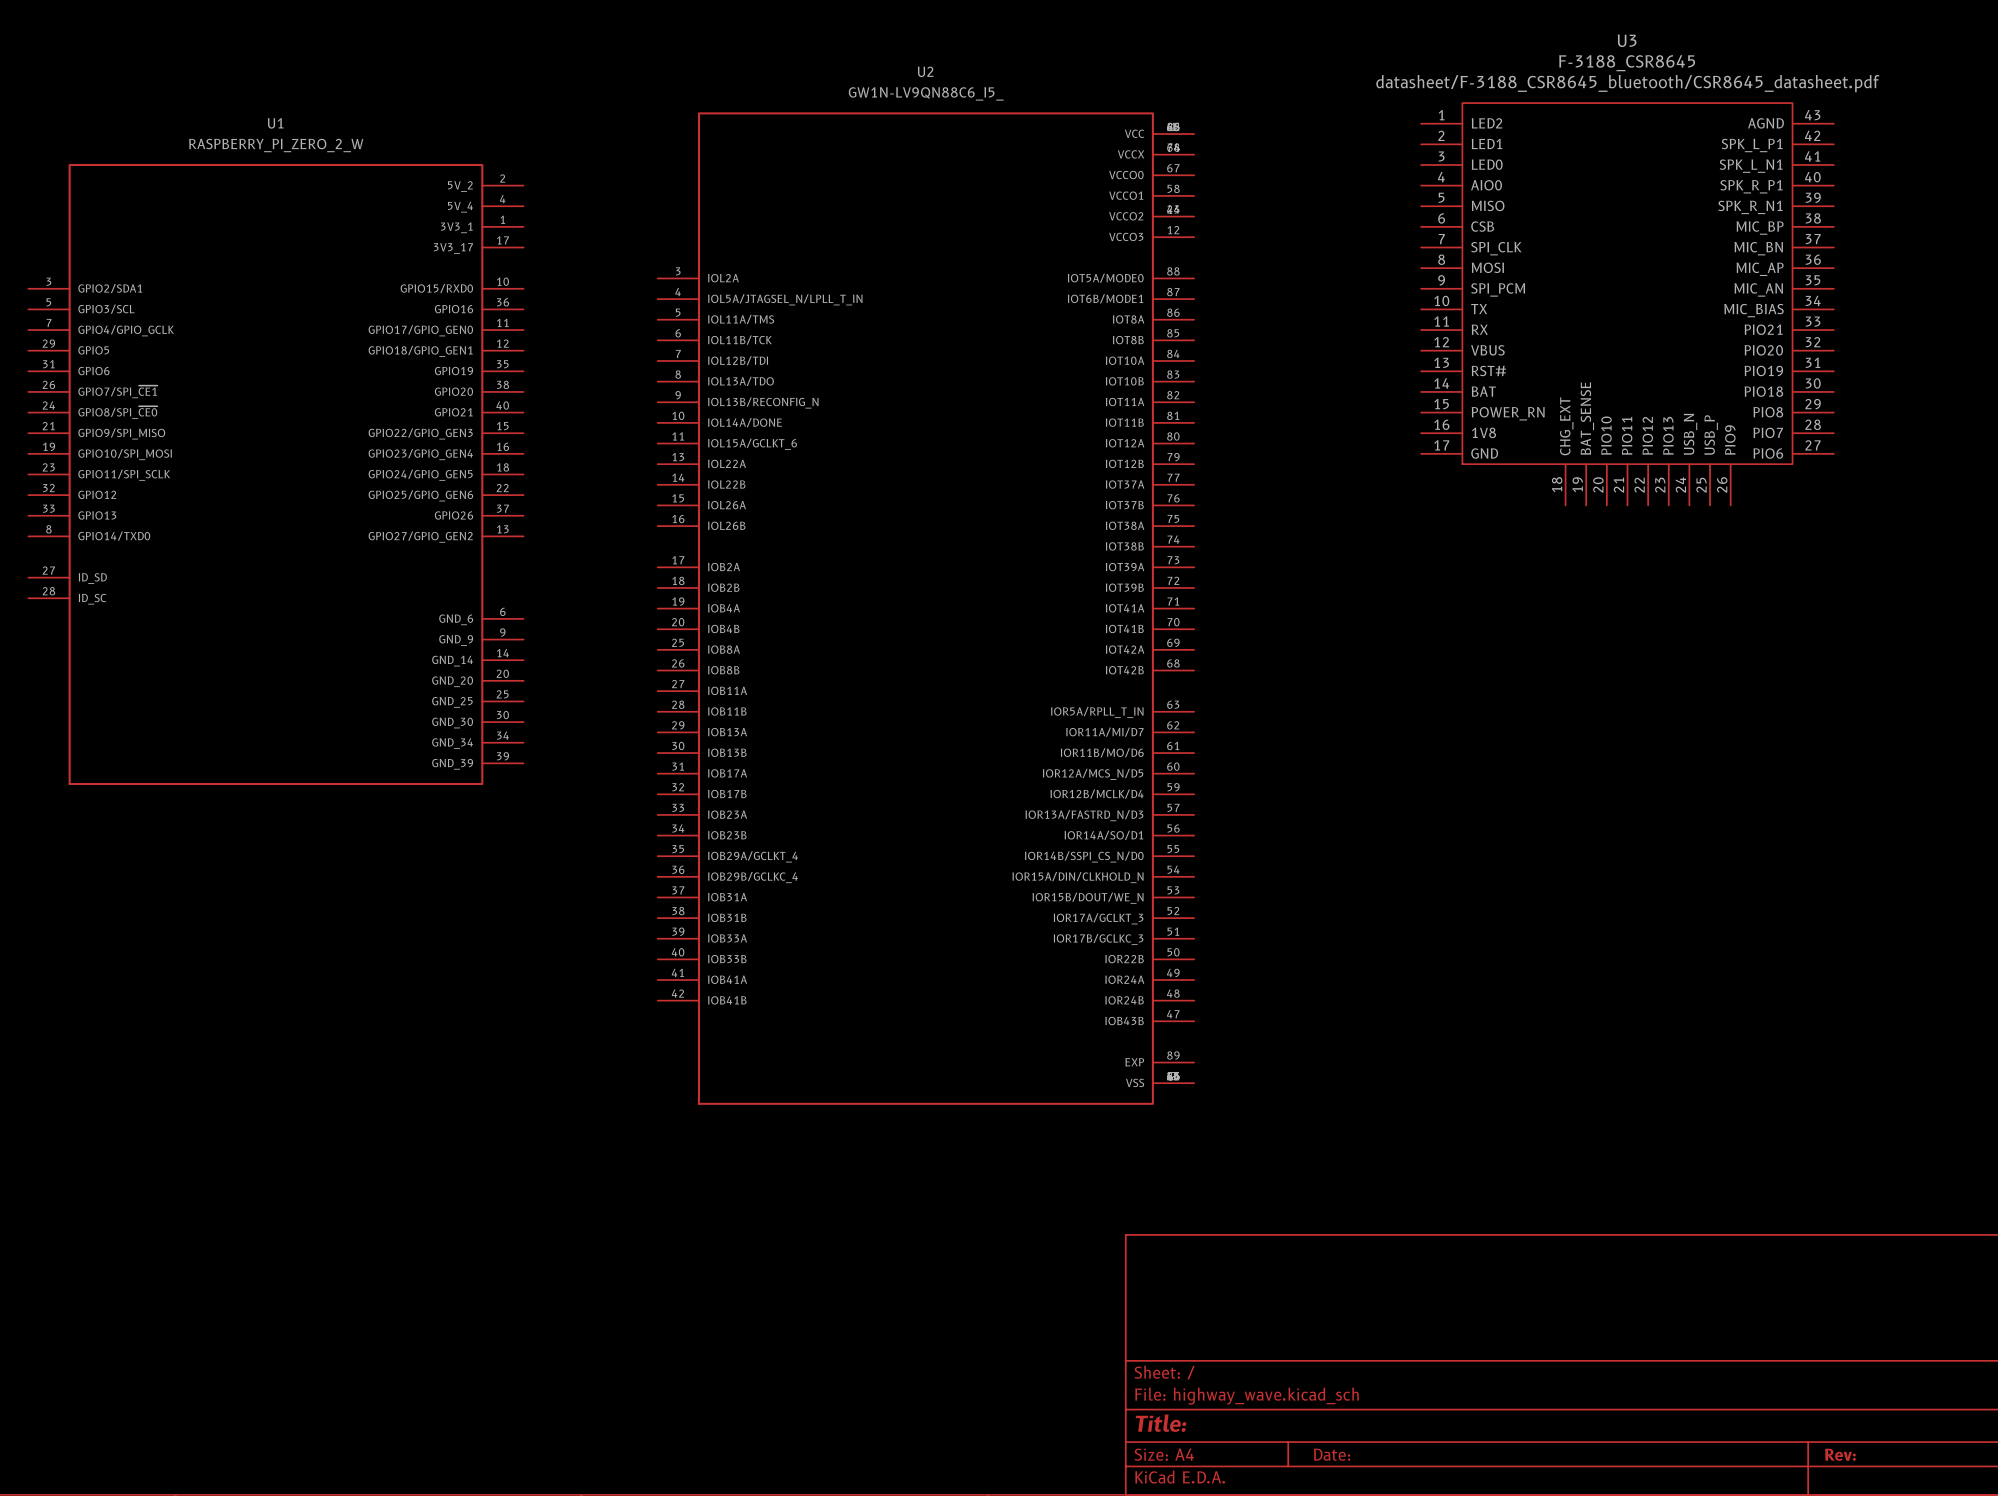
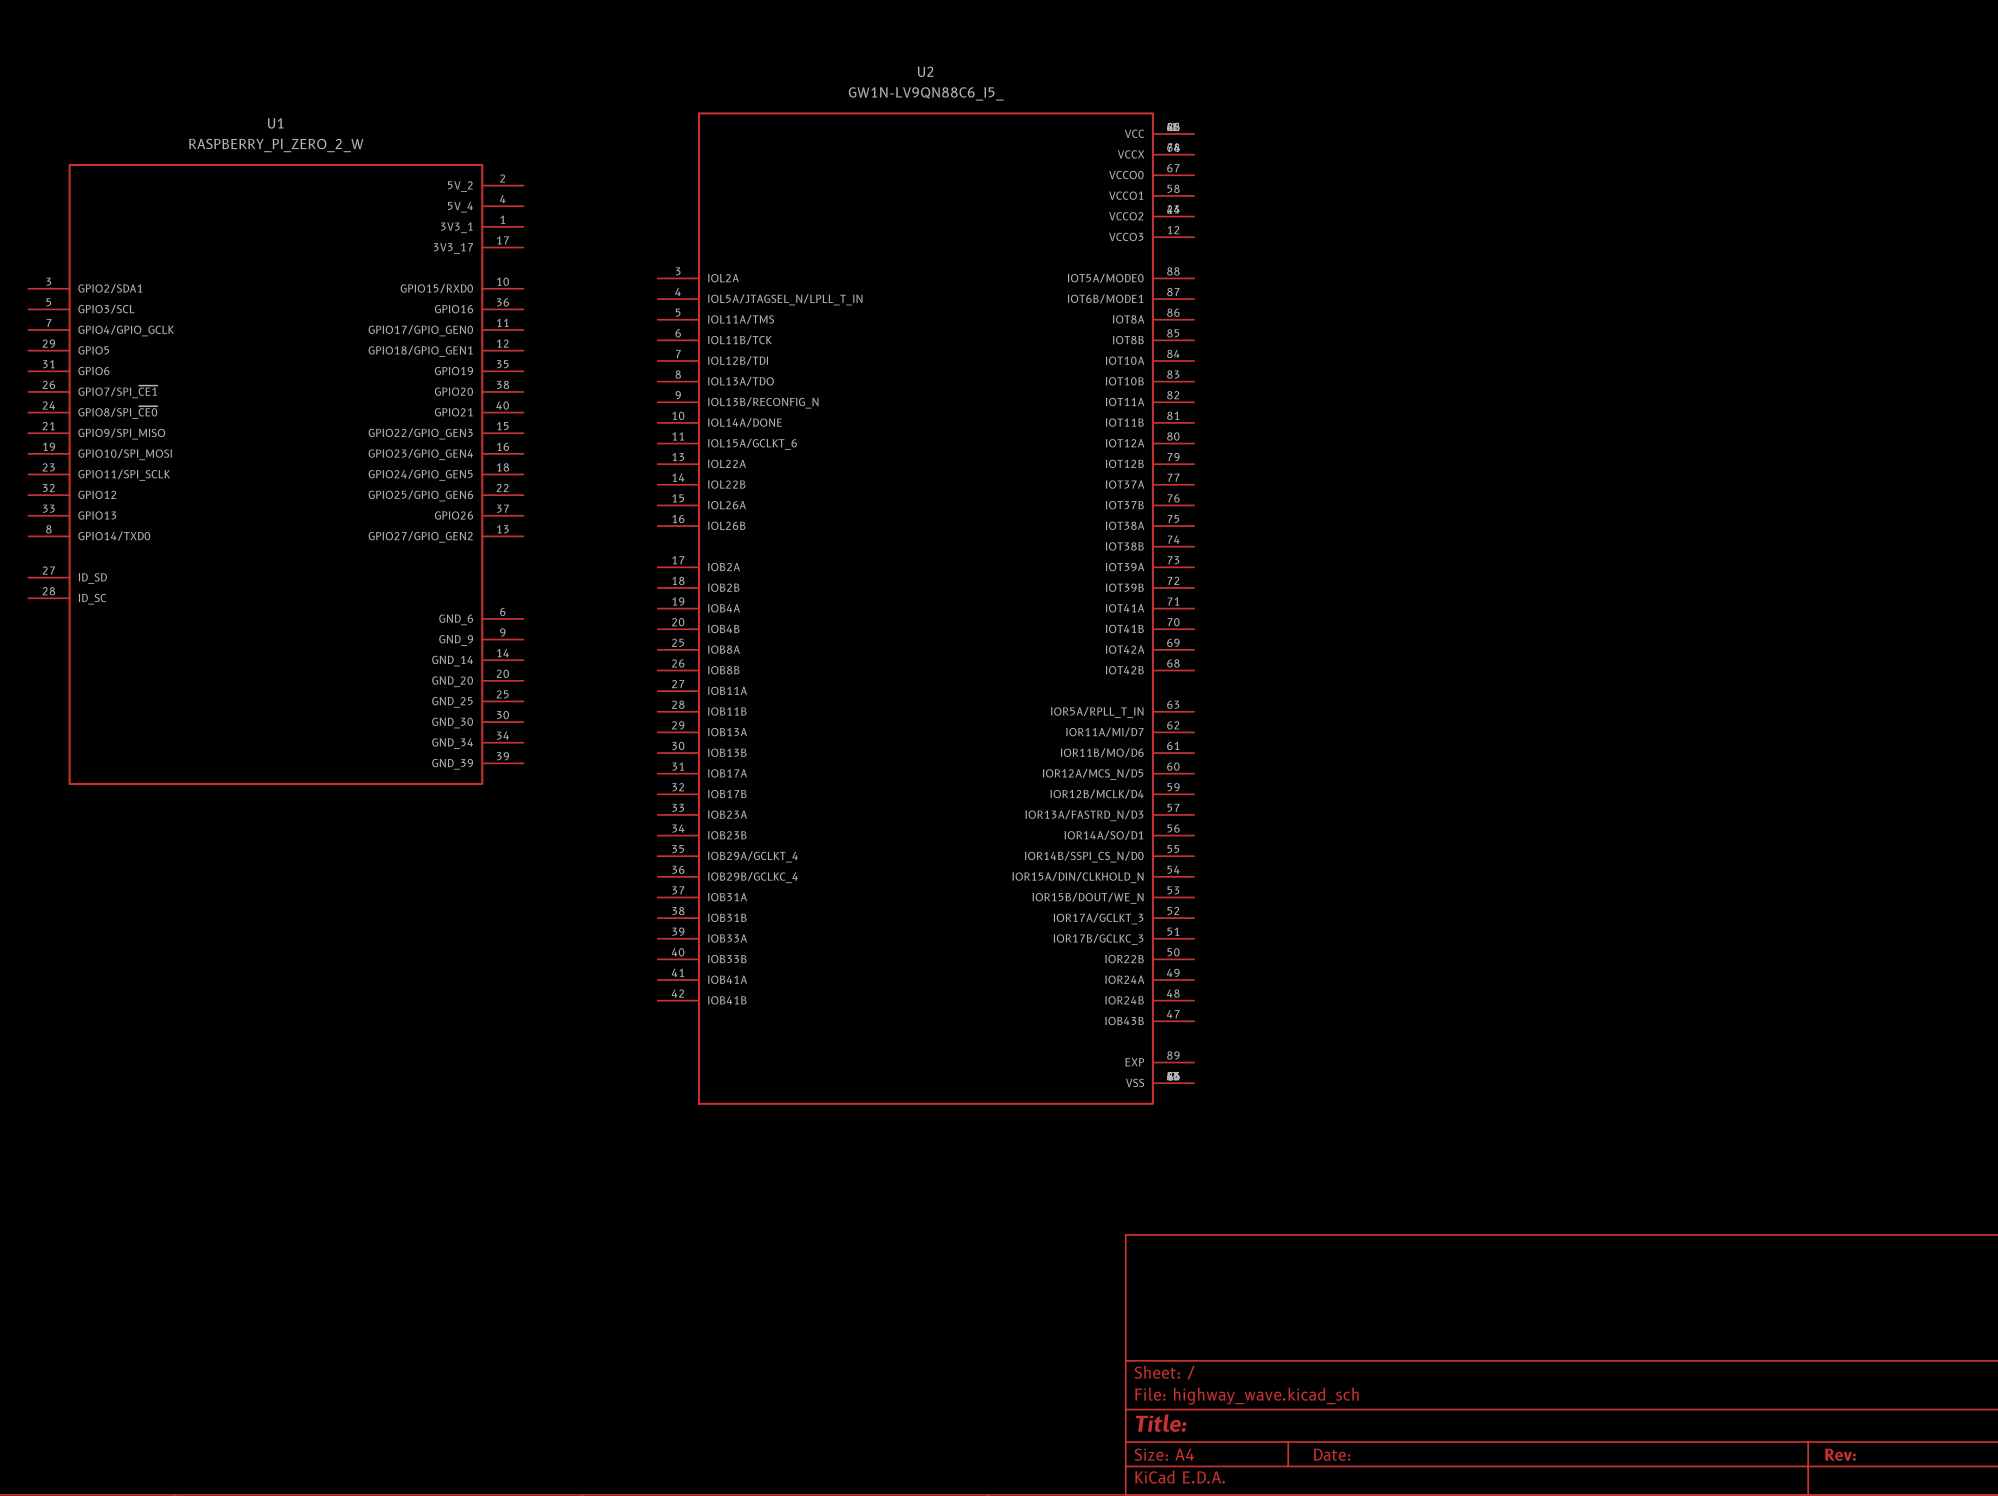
U3: F-3188_CSR8645 (1627, 304) -> none

